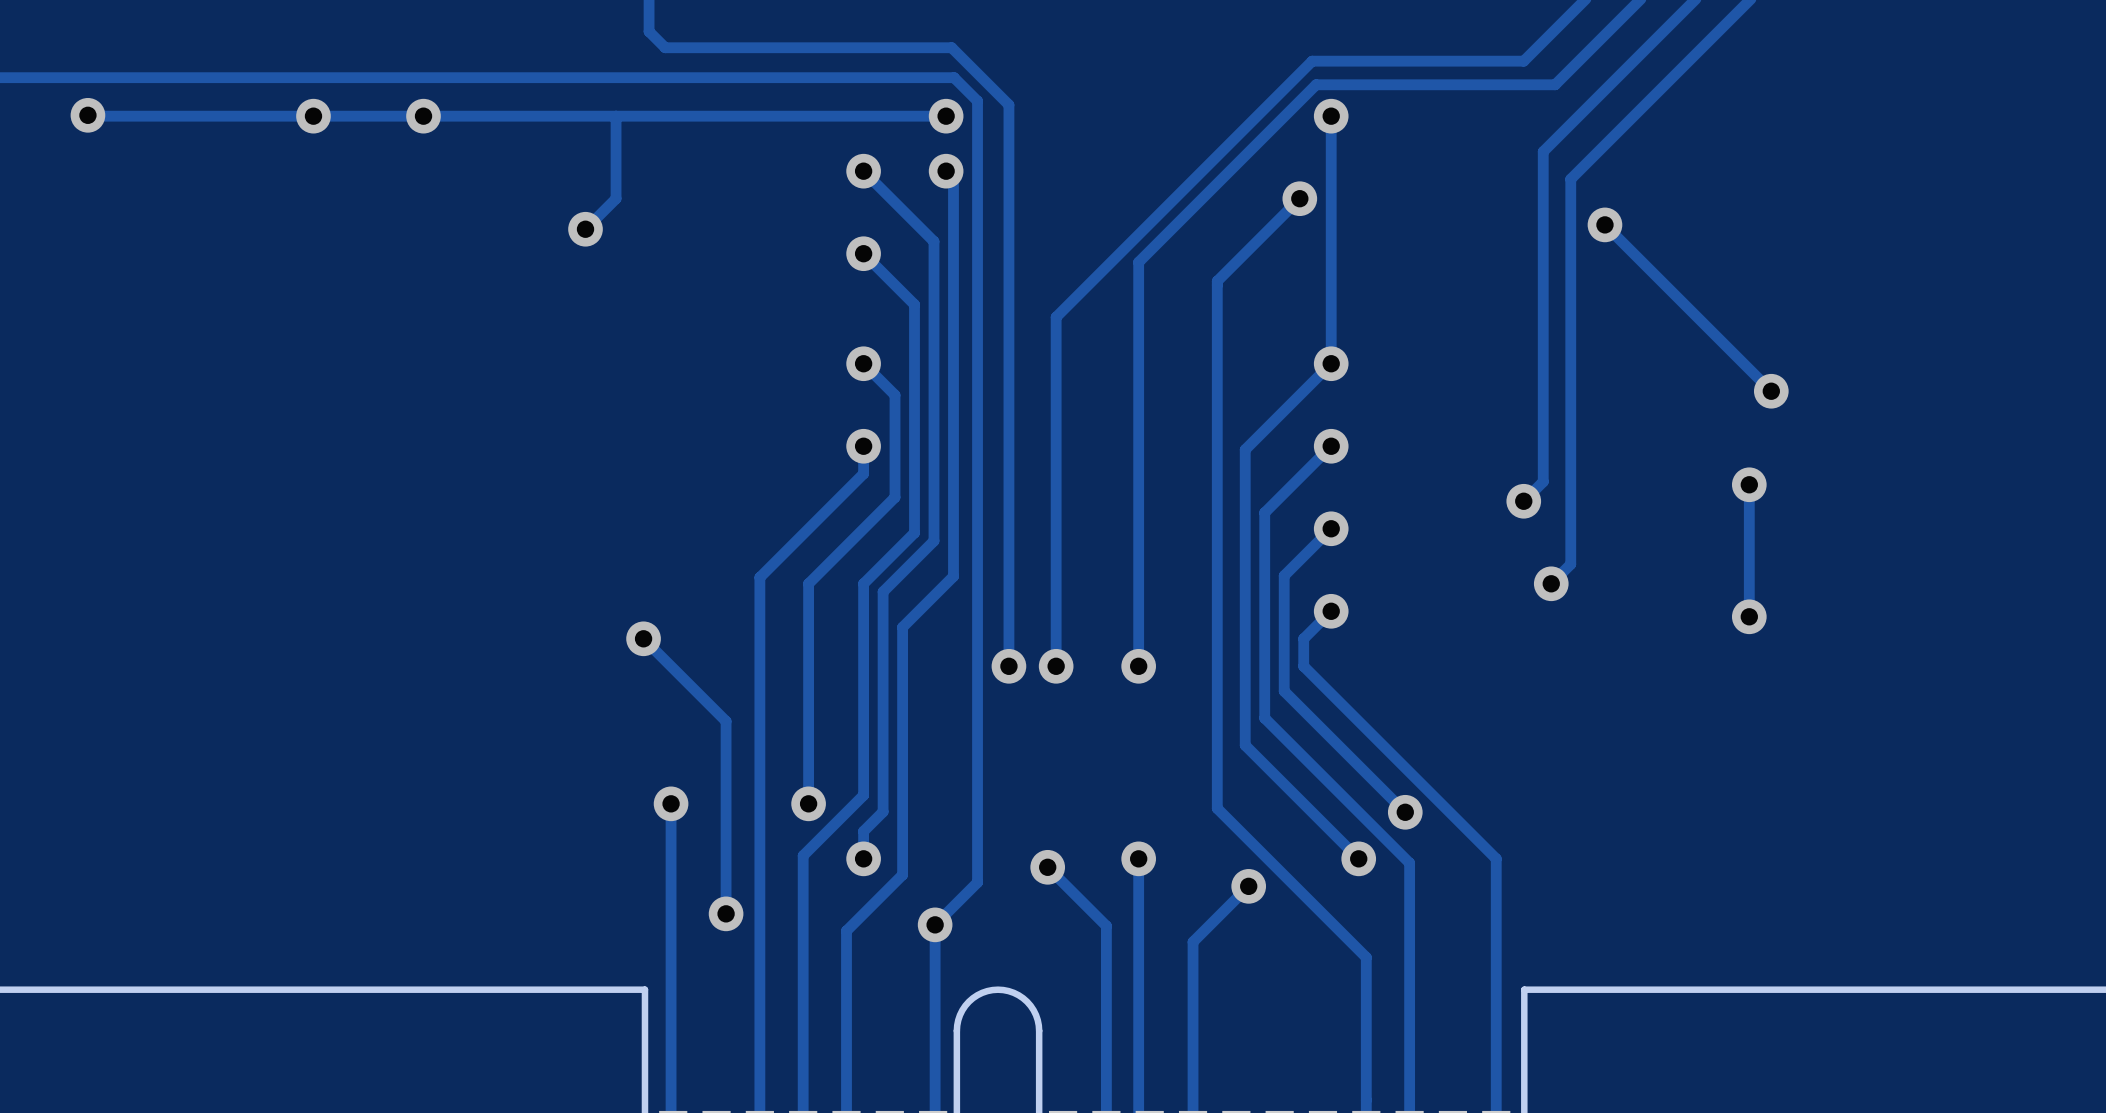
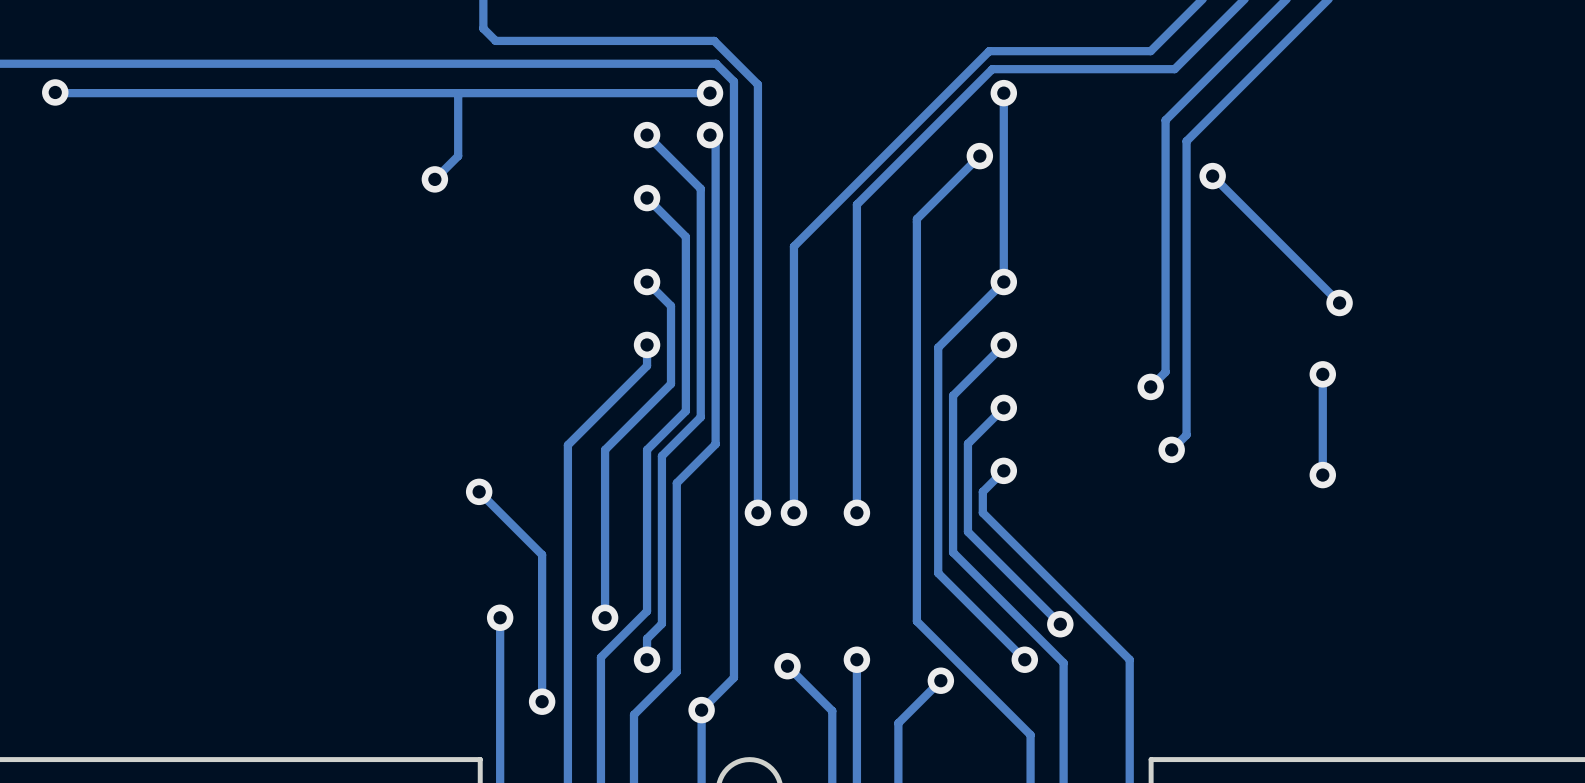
via: (313, 116) -> none
via: (423, 116) -> none

